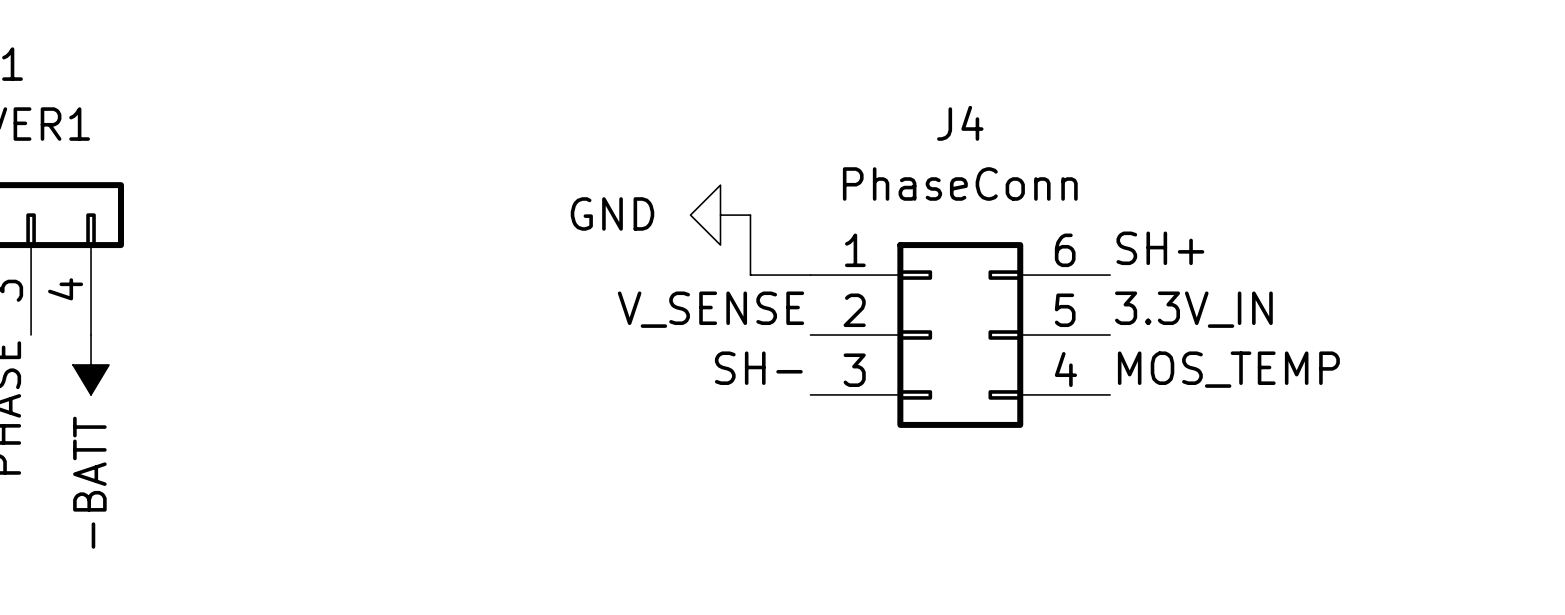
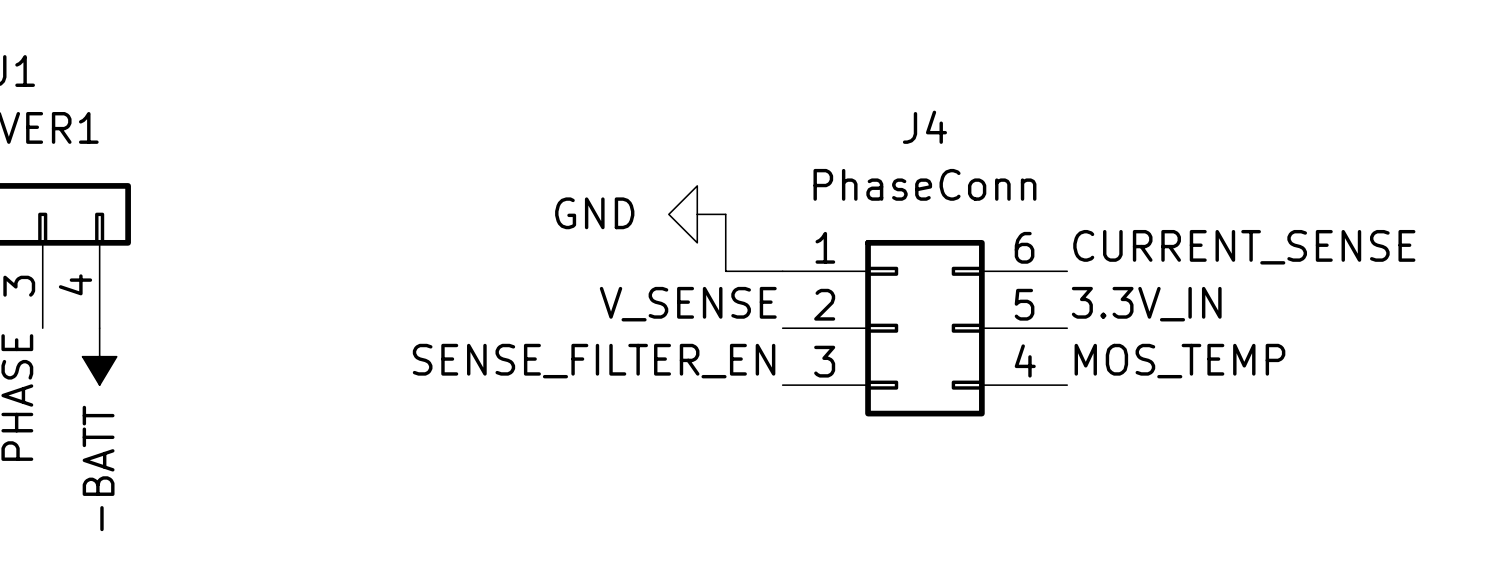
label: SH+ (1160, 248) -> CURRENT_SENSE (1244, 247)
label: SH- (758, 368) -> SENSE_FILTER_EN (594, 361)

